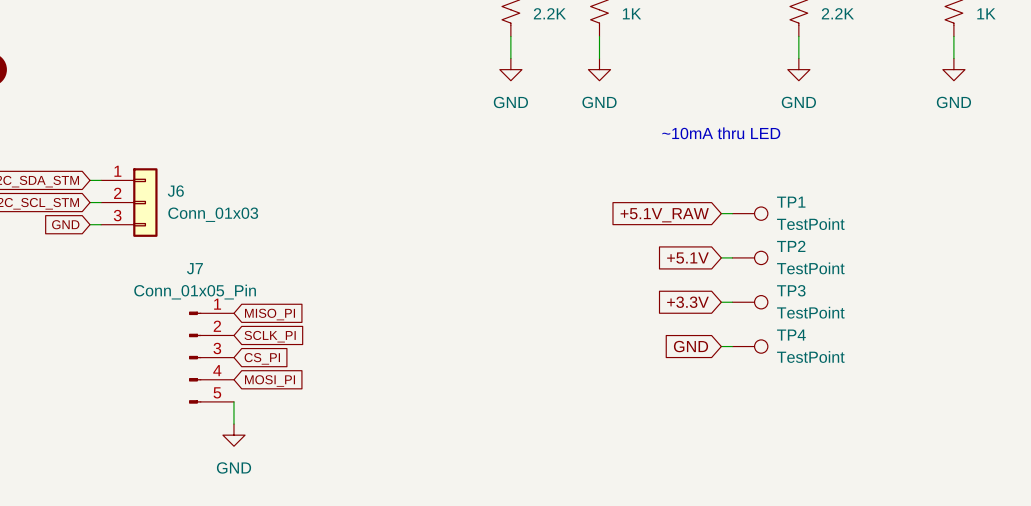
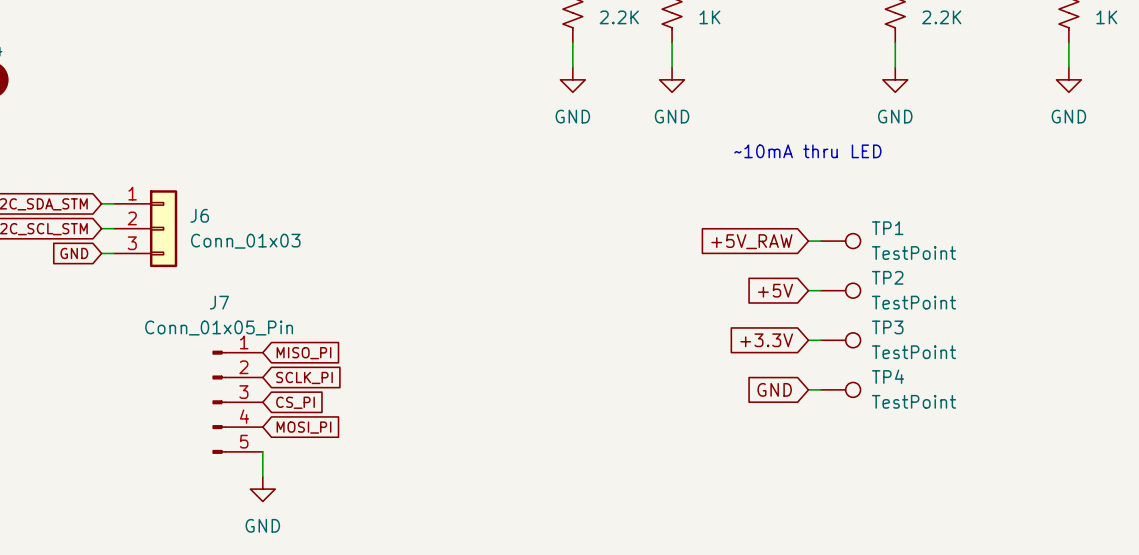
global label: +5.1V_RAW (664, 215) -> +5V_RAW (751, 241)
global label: +5.1V (687, 258) -> +5V (775, 290)

